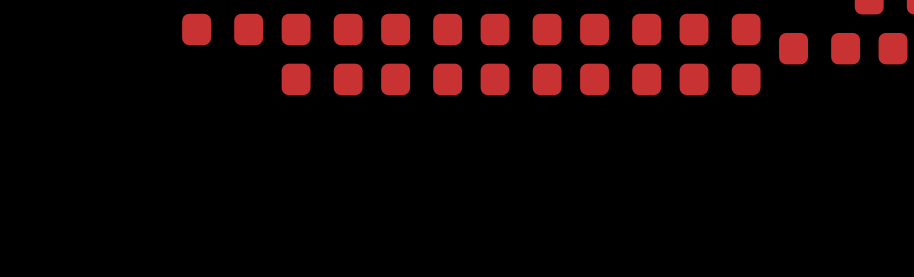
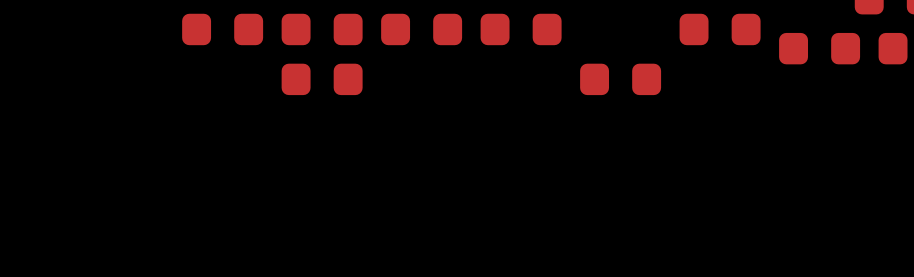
part: (620, 29) -> none
part: (421, 79) -> none
part: (521, 79) -> none
part: (720, 79) -> none

